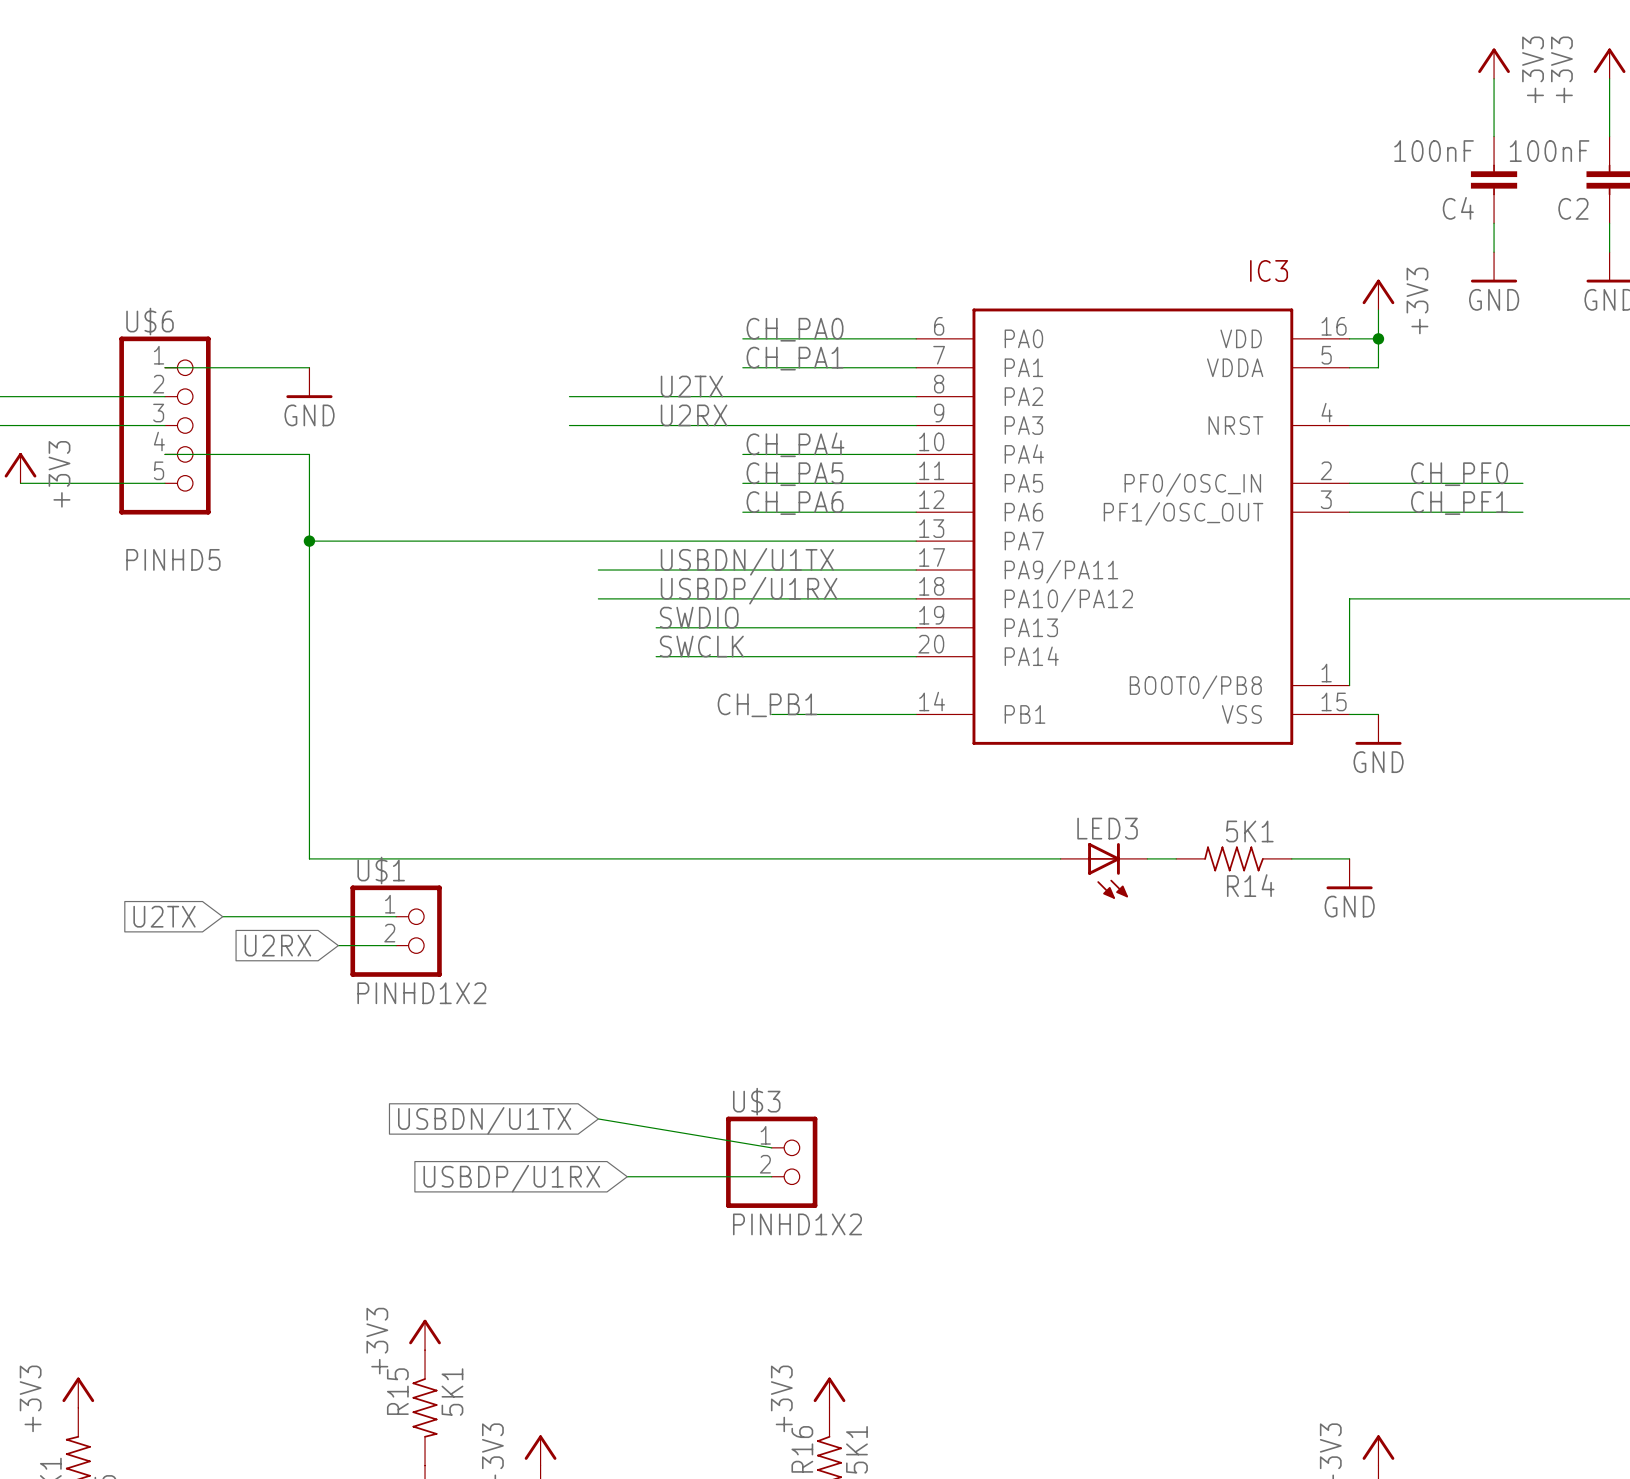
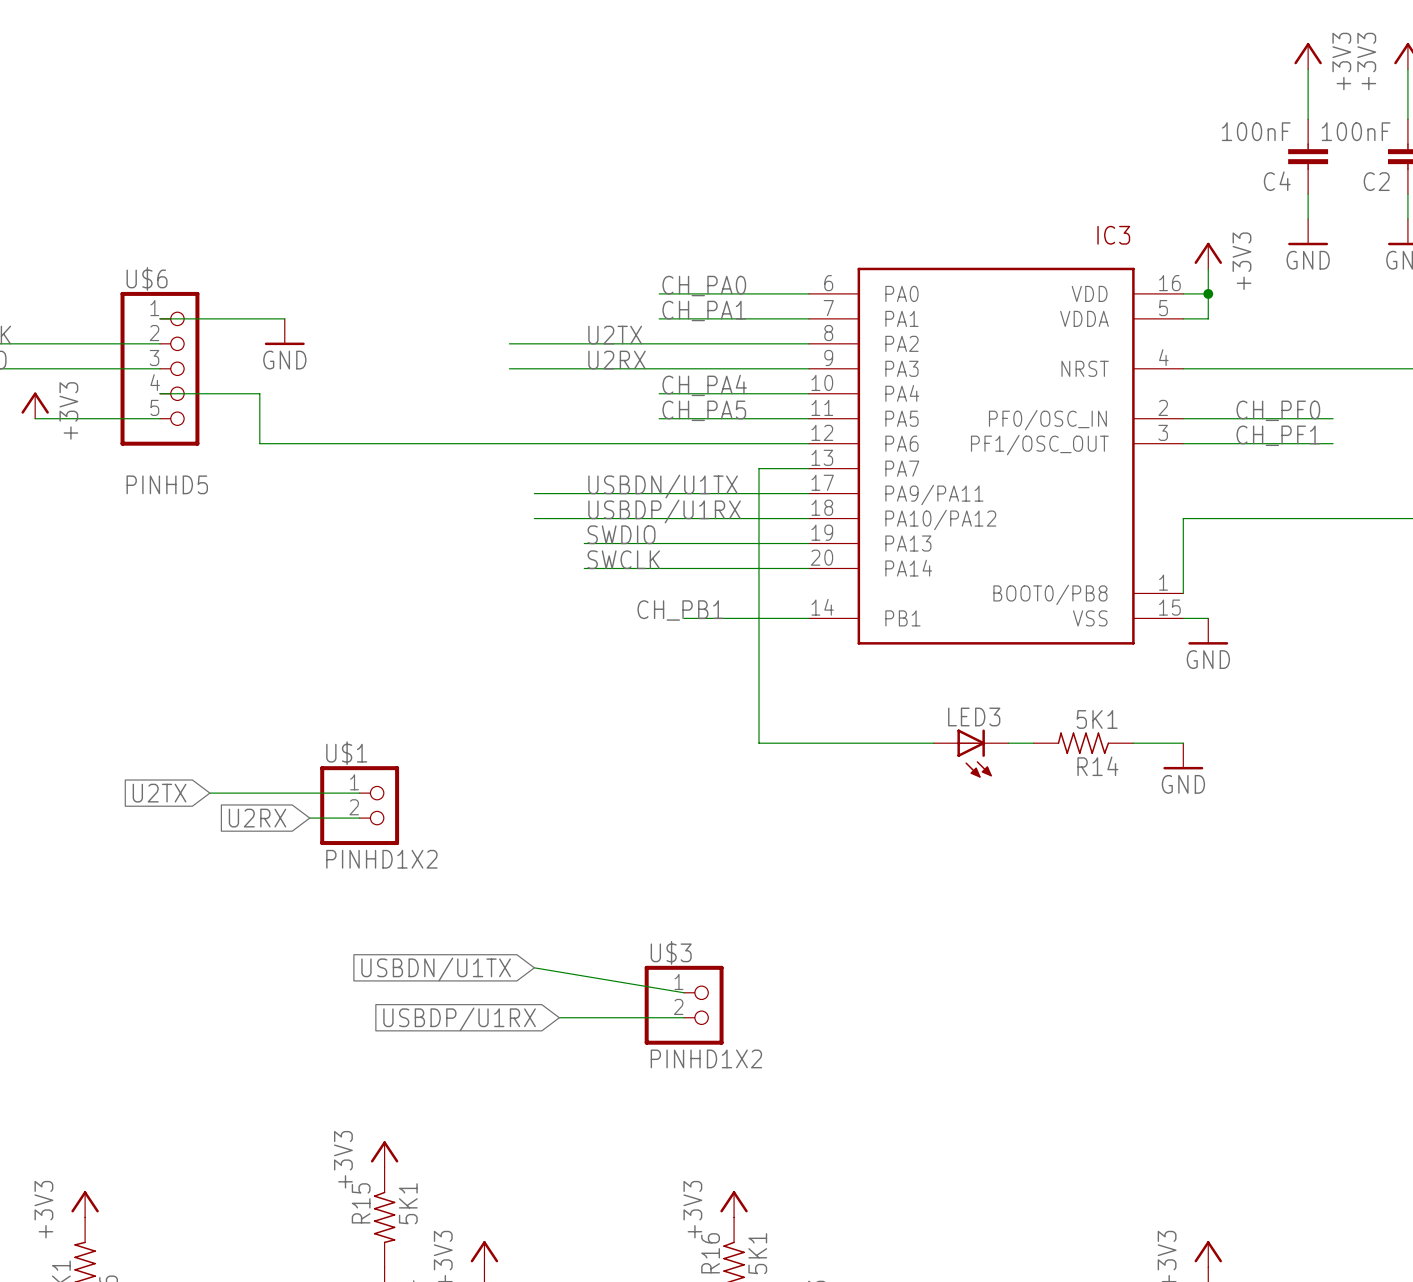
wire: (280, 454) (309, 454) (309, 858) (858, 858) -> (259, 393) (259, 443) (659, 443)
label: CH_PA6 (795, 503) -> none
wire: (309, 541) (858, 541) -> (759, 743) (759, 468)
junction: (309, 541) -> none

